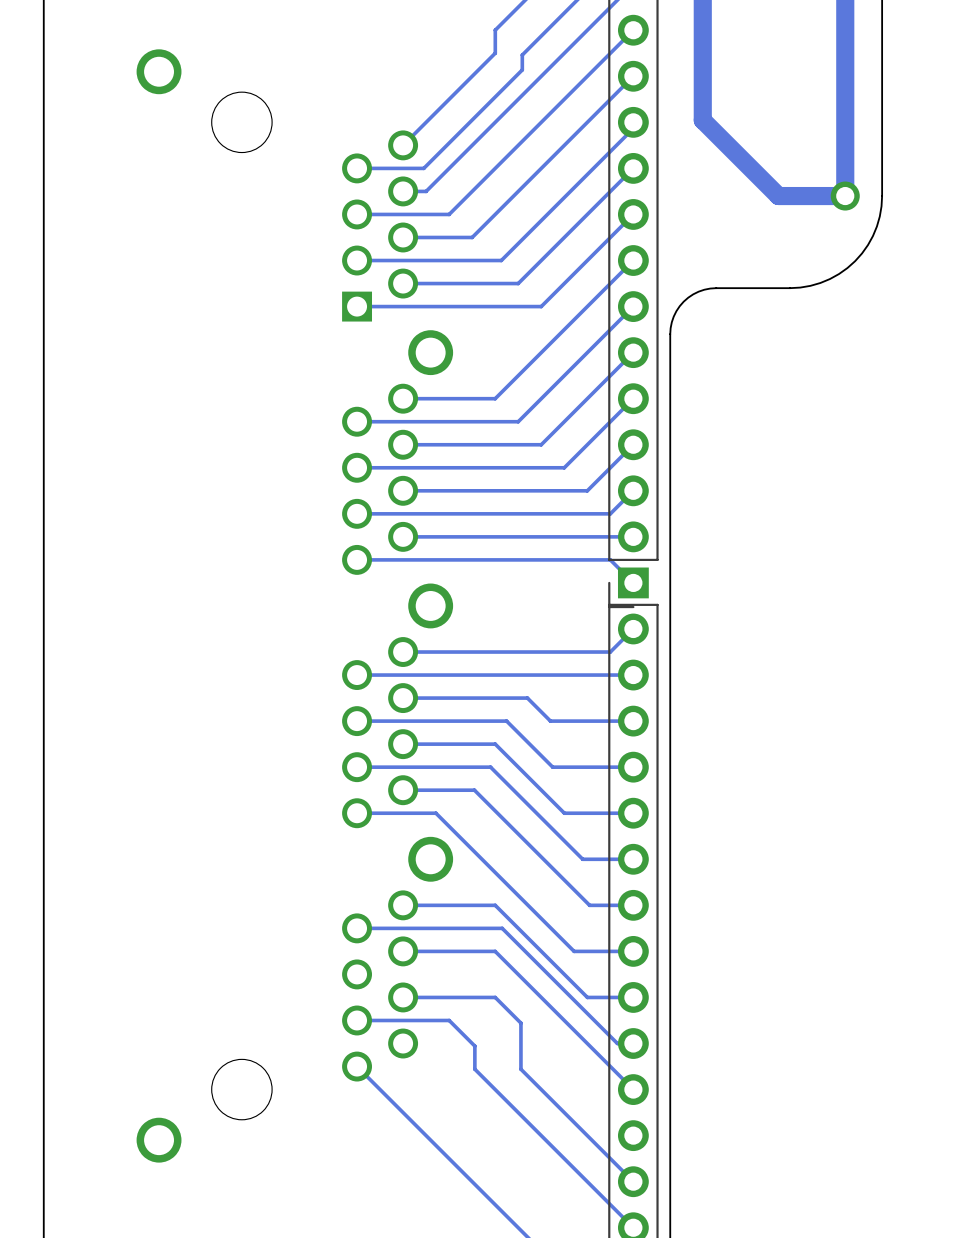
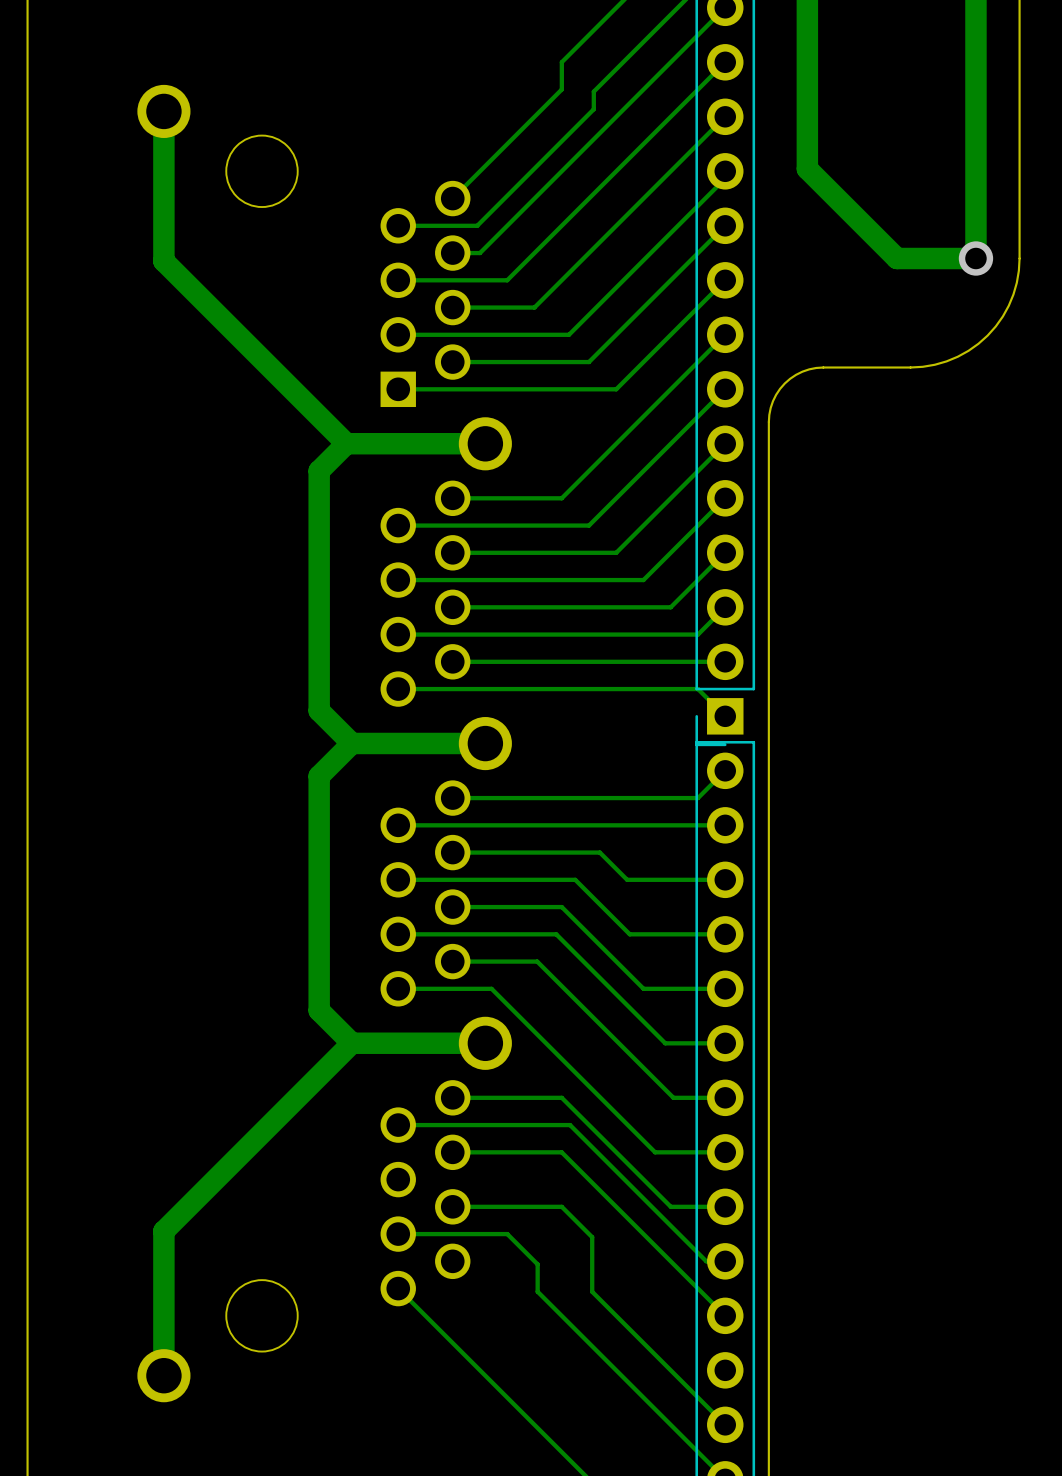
track: none -> (163, 111) (163, 261) (346, 443)
track: none -> (346, 443) (319, 470) (319, 710) (351, 743)
track: none -> (485, 443) (346, 443)
track: none -> (351, 743) (319, 776) (319, 1010) (351, 1043)
track: none -> (485, 743) (351, 743)
track: none -> (351, 1043) (163, 1231) (163, 1375)
track: none -> (485, 1043) (351, 1043)

